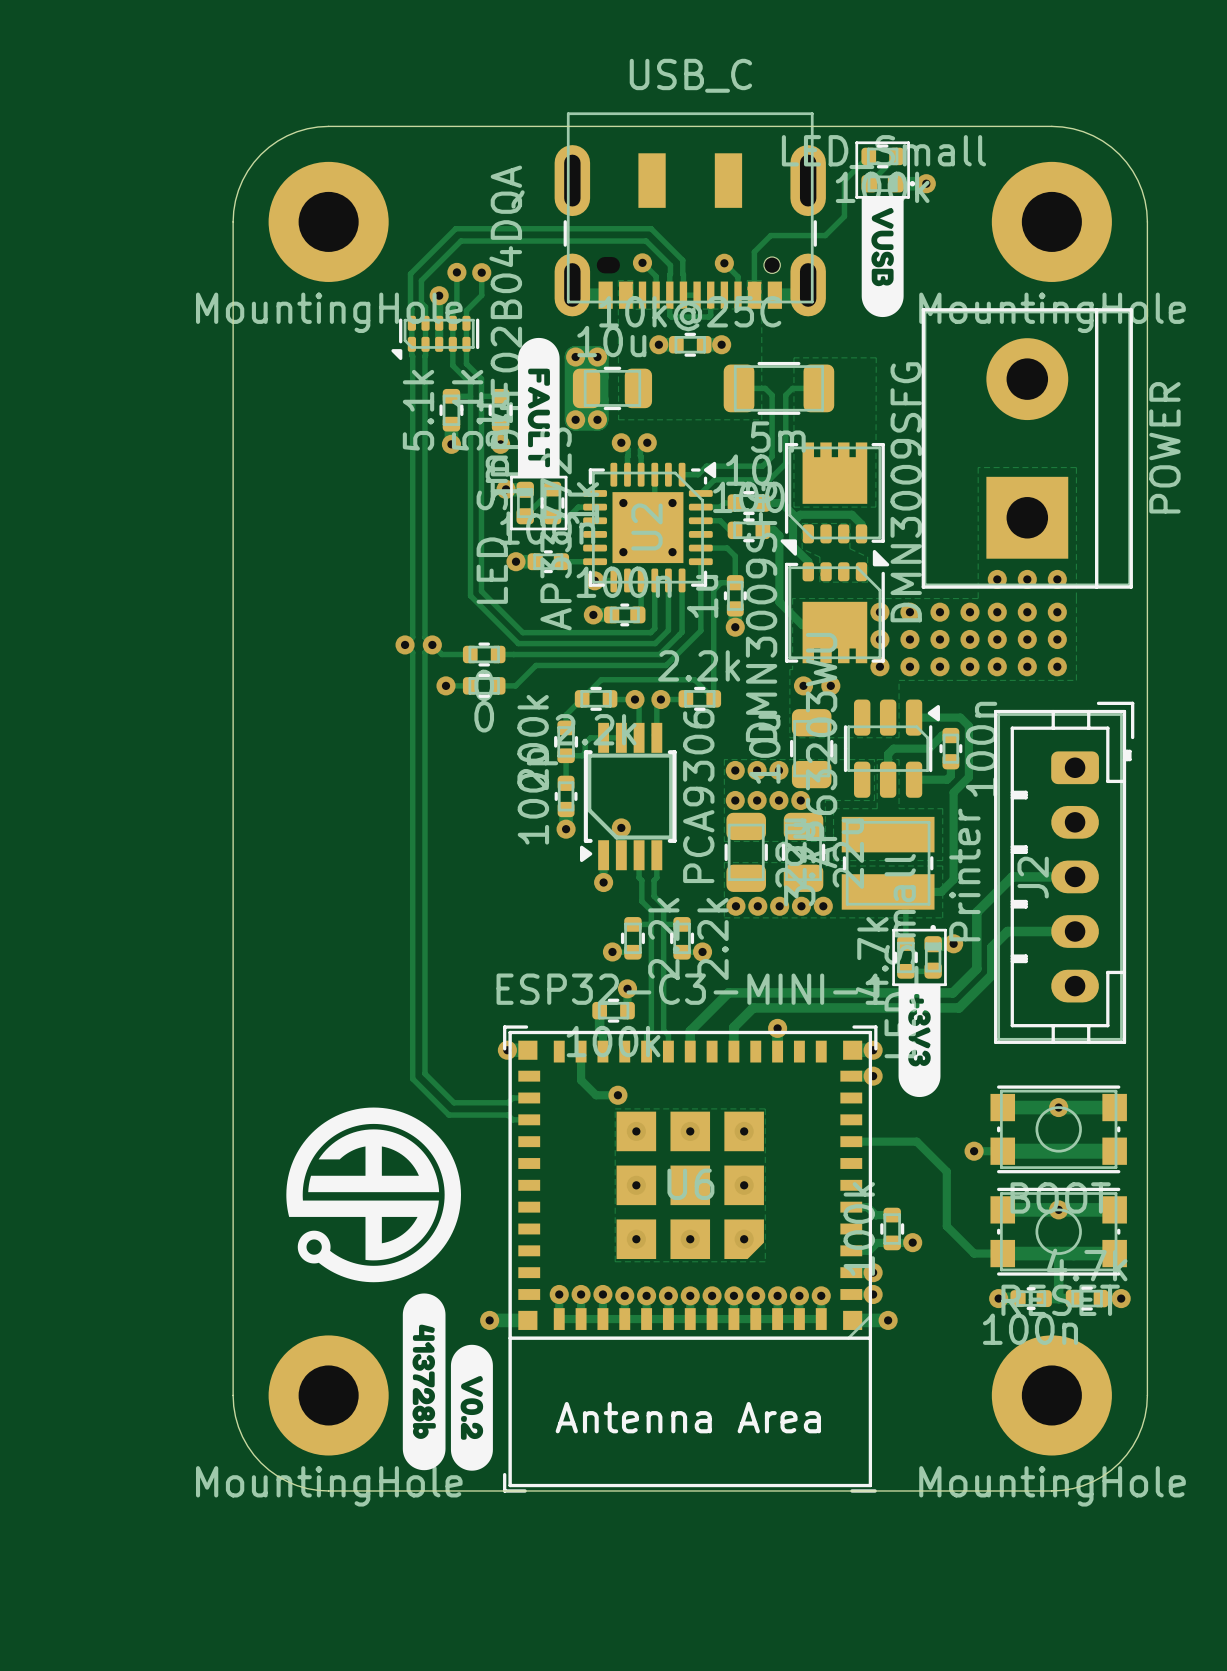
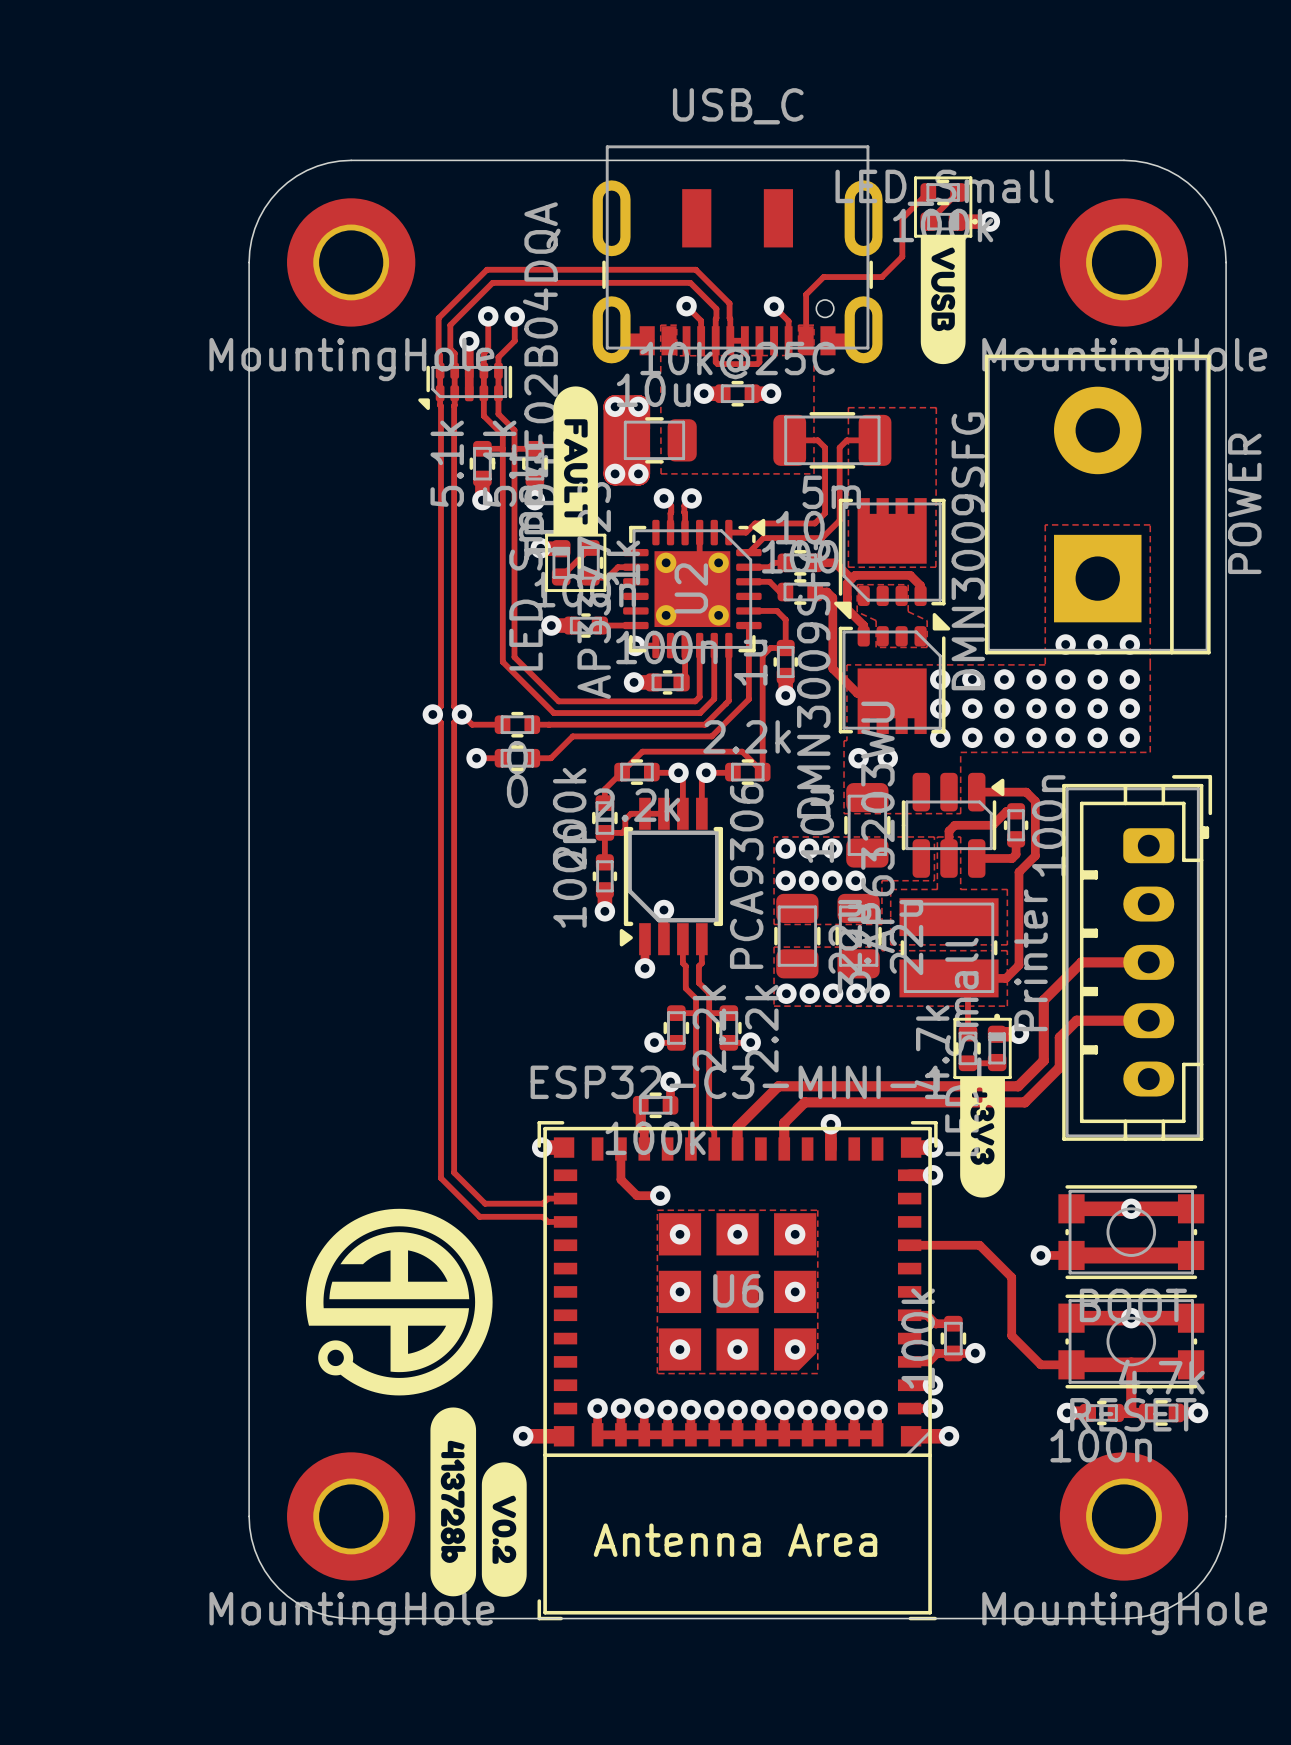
J2 name: J2 (1033, 877) -> none

